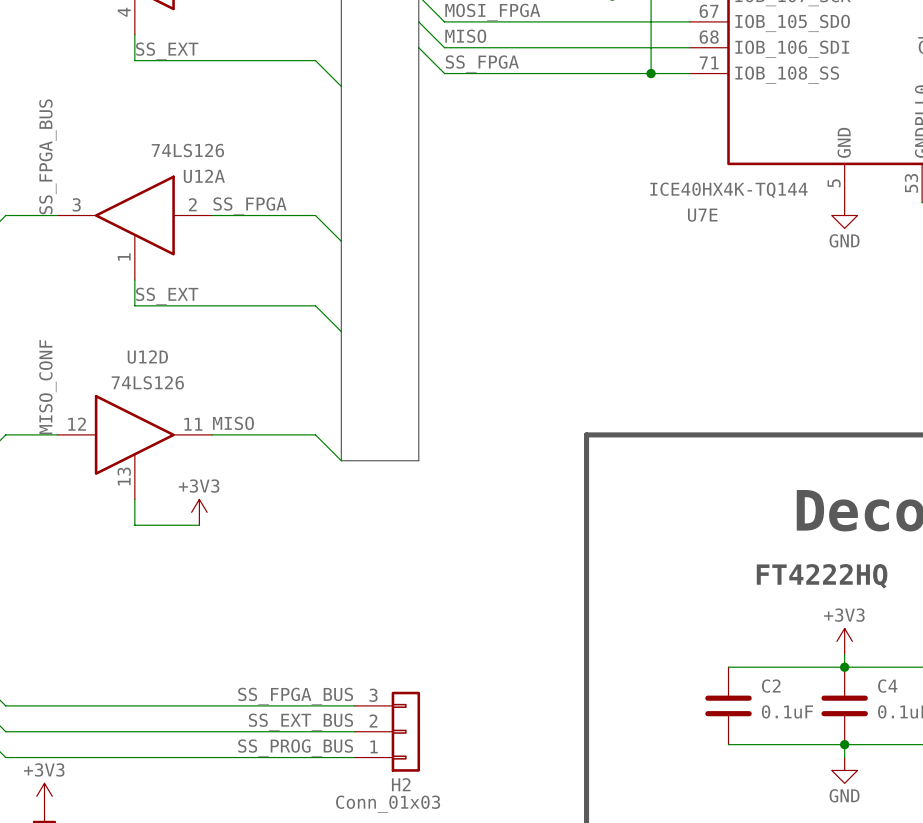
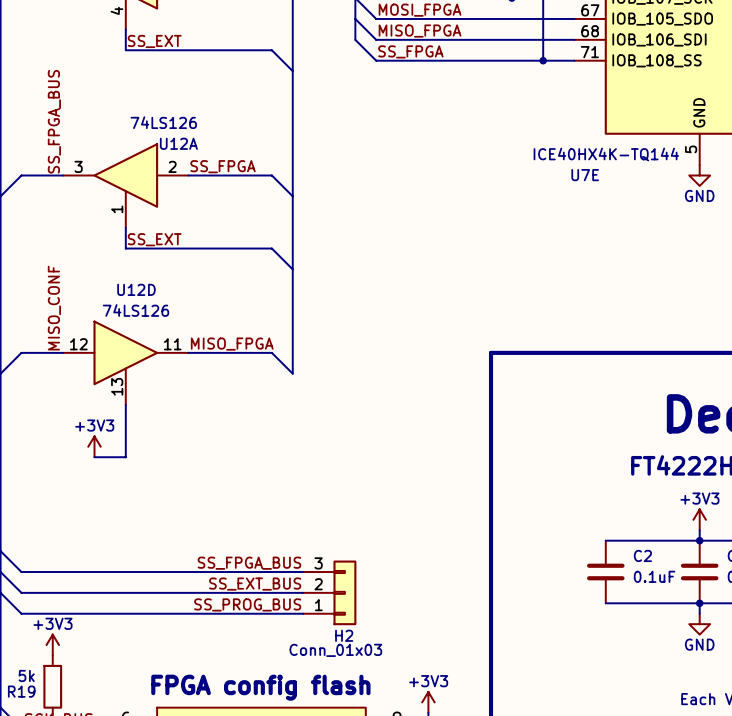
label: MISO (465, 36) -> MISO_FPGA (420, 31)
bus: (418, 47) (418, 460) (341, 460) -> none
label: MISO (233, 423) -> MISO_FPGA (232, 344)
power symbol position: +3V3 (199, 512) -> +3V3 (94, 446)
wire: (134, 525) (199, 525) -> (125, 425) (125, 457) (94, 457)

